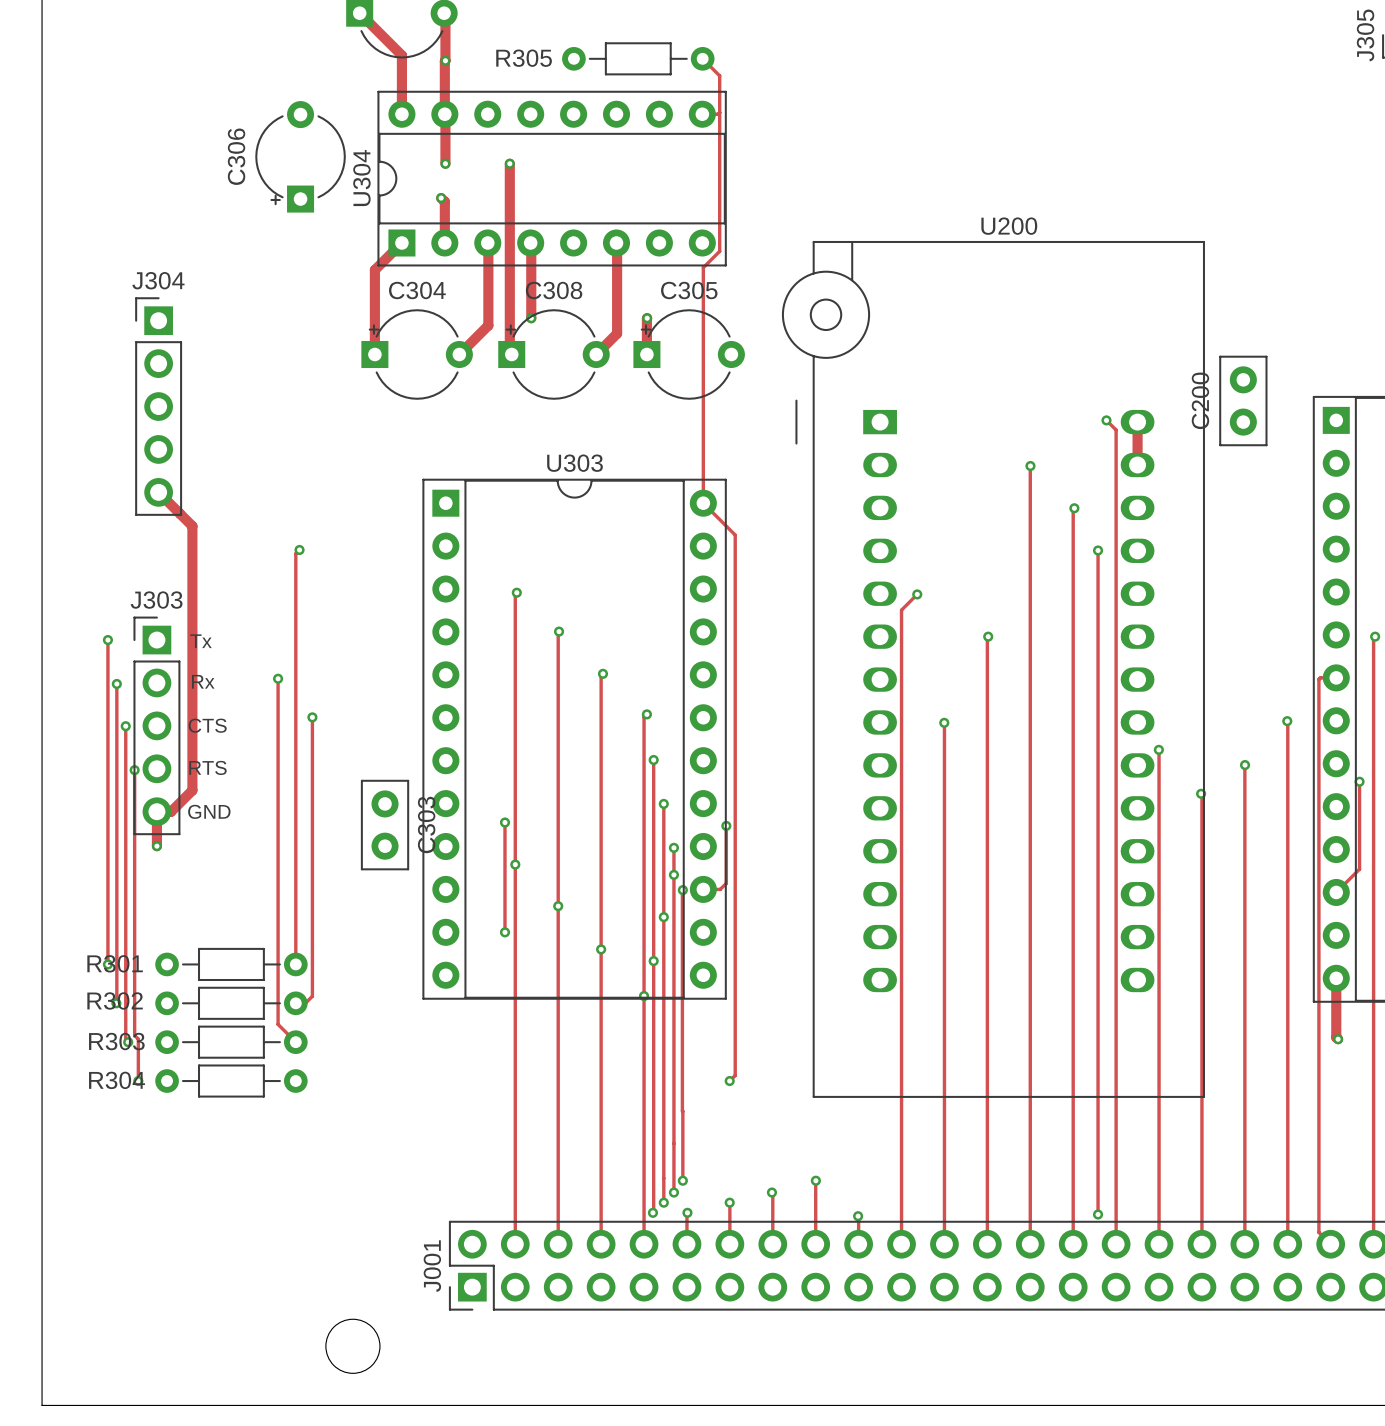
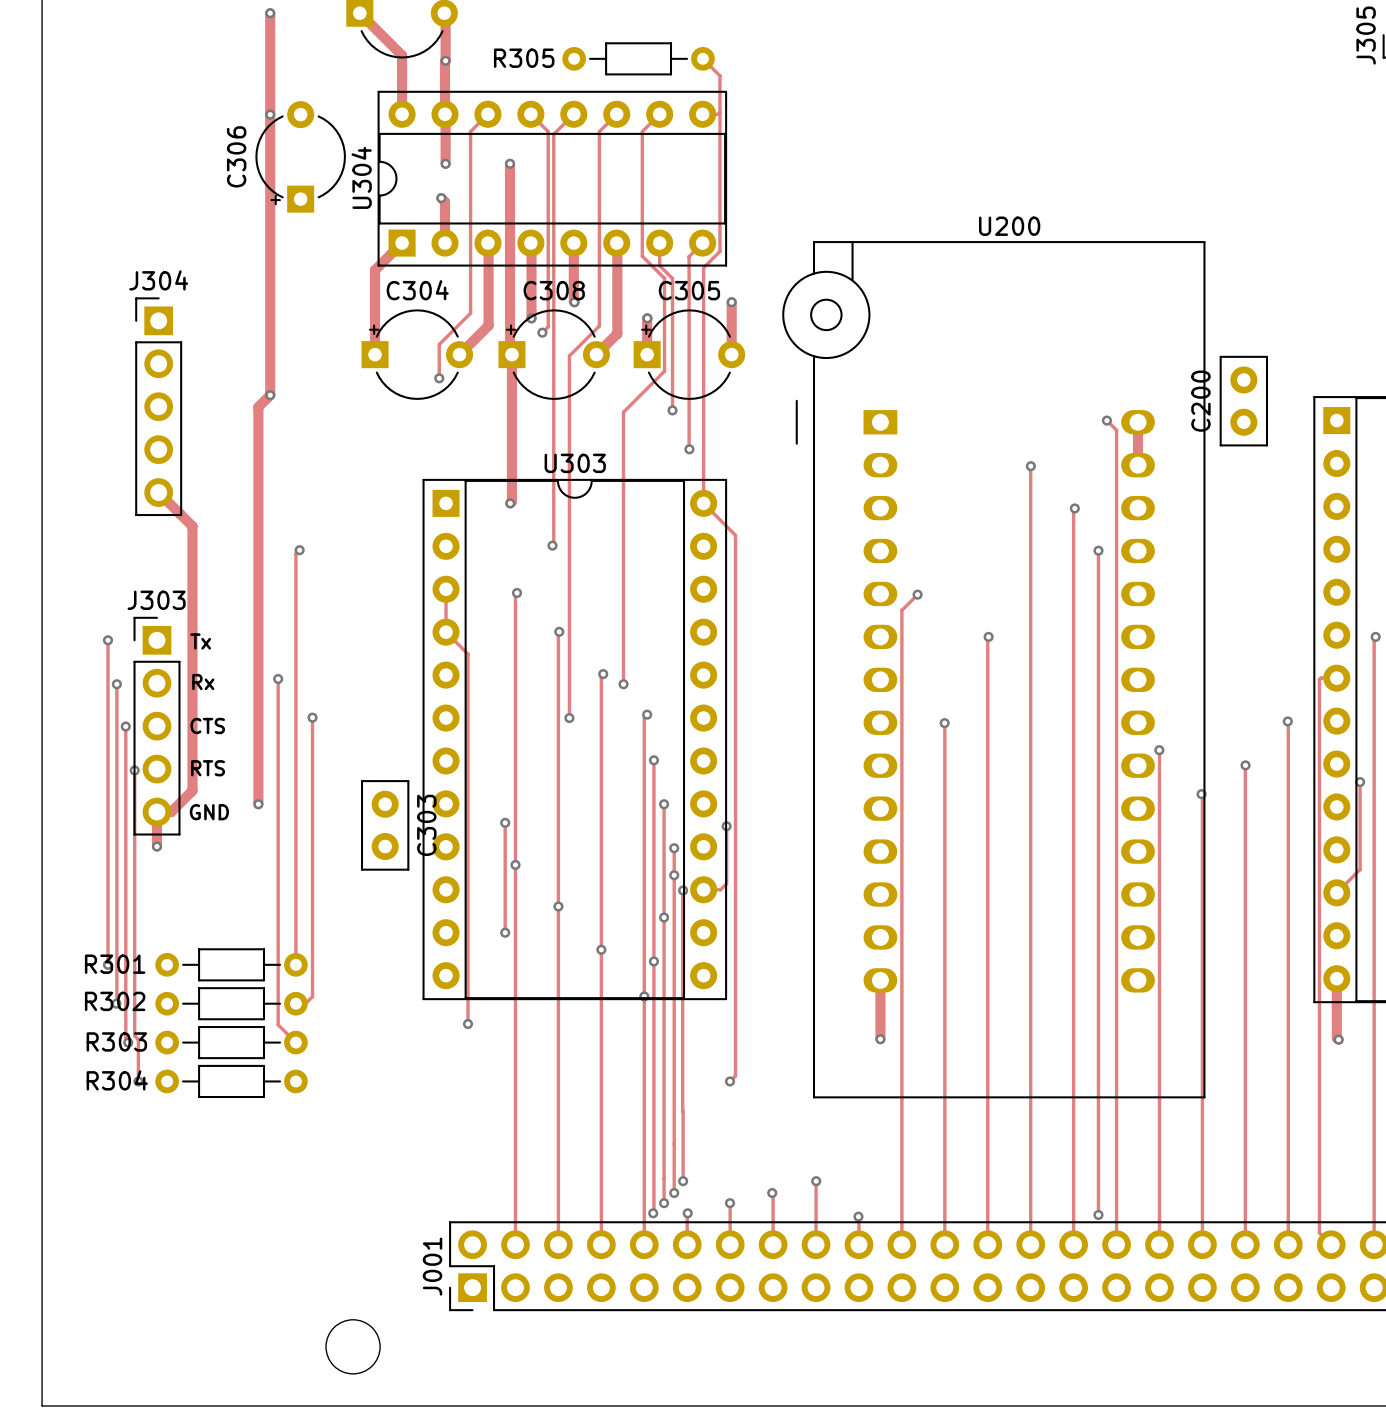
track: none -> (270, 13) (270, 395) (258, 407) (258, 804)
via: none -> (270, 13)
via: none -> (270, 114)
track: none -> (487, 114) (470, 131) (470, 313) (439, 344) (439, 378)
track: none -> (530, 114) (548, 131) (548, 326) (542, 332)
track: none -> (573, 114) (553, 134) (552, 545)
track: none -> (616, 114) (599, 131) (599, 326) (569, 355) (569, 718)
track: none -> (659, 114) (642, 131) (642, 256) (664, 278) (664, 371) (623, 412) (623, 684)
track: none -> (573, 243) (574, 302)
track: none -> (659, 243) (659, 265) (672, 278) (672, 410)
track: none -> (702, 243) (689, 256) (689, 449)
via: none -> (574, 302)
track: none -> (731, 302) (731, 354)
via: none -> (731, 302)
via: none -> (542, 332)
track: none -> (511, 354) (511, 501) (510, 503)
via: none -> (439, 378)
via: none -> (270, 395)
via: none -> (672, 410)
via: none -> (689, 449)
via: none -> (510, 503)
via: none -> (552, 545)
track: none -> (446, 589) (446, 632) (468, 654) (468, 1023)
via: none -> (623, 684)
via: none -> (569, 718)
via: none -> (258, 804)
track: none -> (880, 980) (880, 1039)
via: none -> (468, 1023)
via: none -> (880, 1039)

